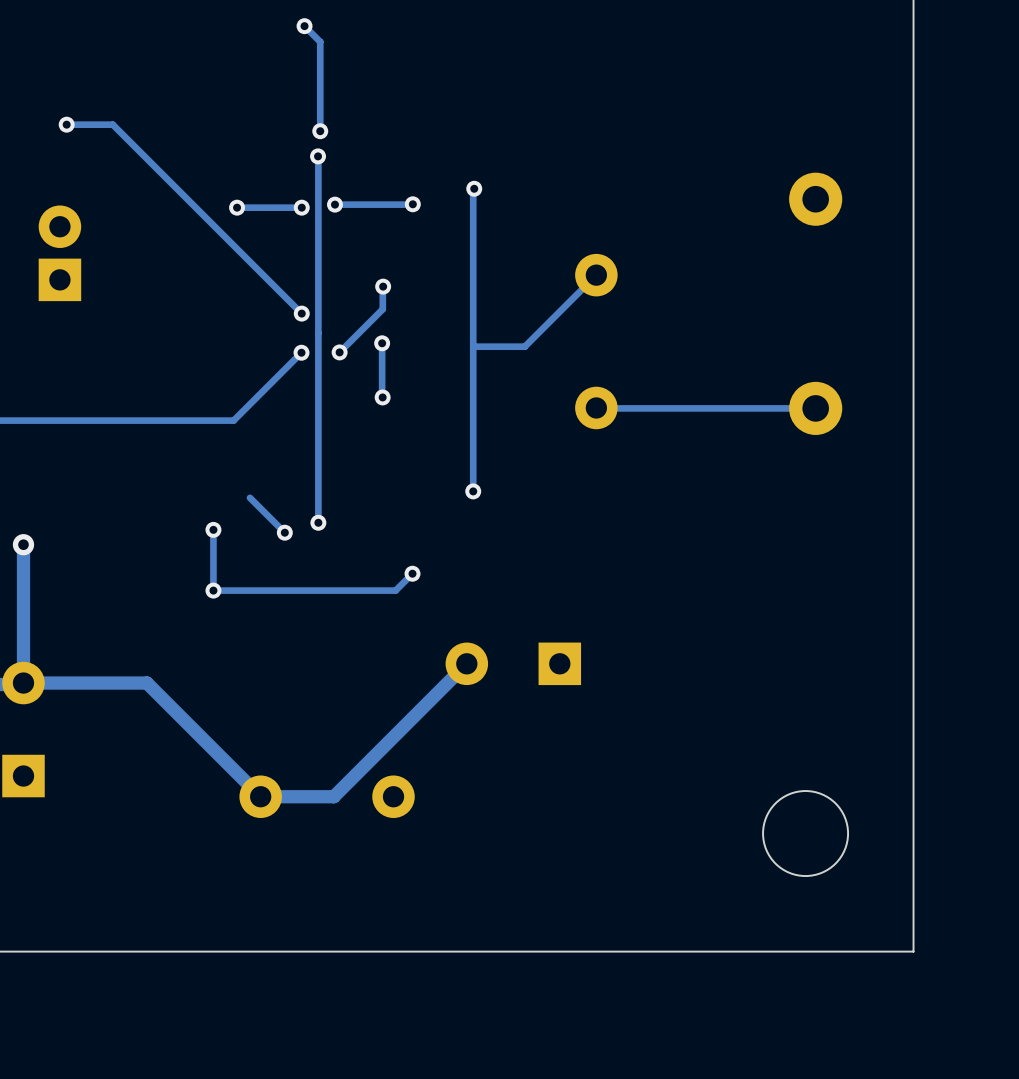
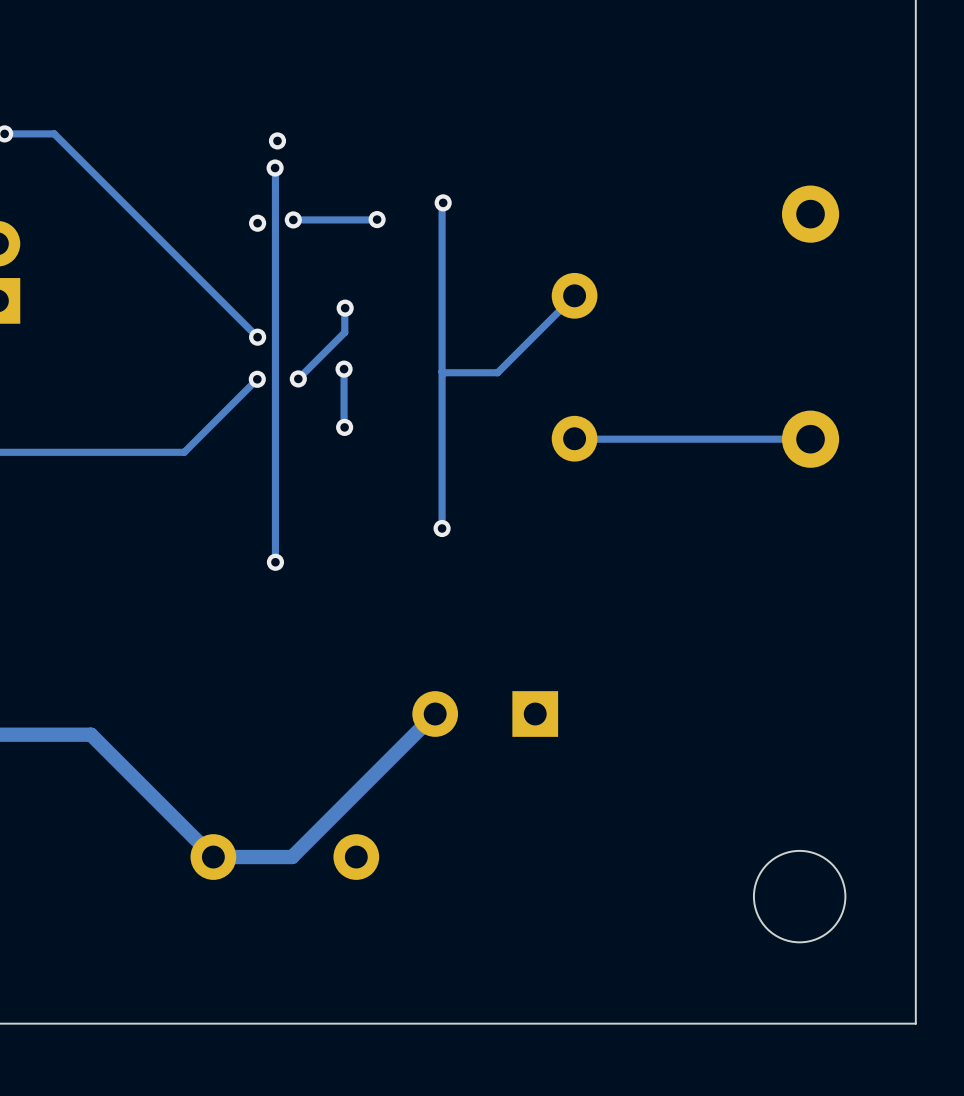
track: (304, 26) (320, 41) (320, 131) -> none
via: (304, 26) -> none
via: (237, 207) -> none
track: (301, 207) (237, 207) -> none
track: (249, 497) (284, 532) -> none
track: (213, 529) (213, 590) (395, 590) (412, 573) -> none
via: (213, 529) -> none
via: (284, 532) -> none
via: (412, 573) -> none
via: (213, 590) -> none

